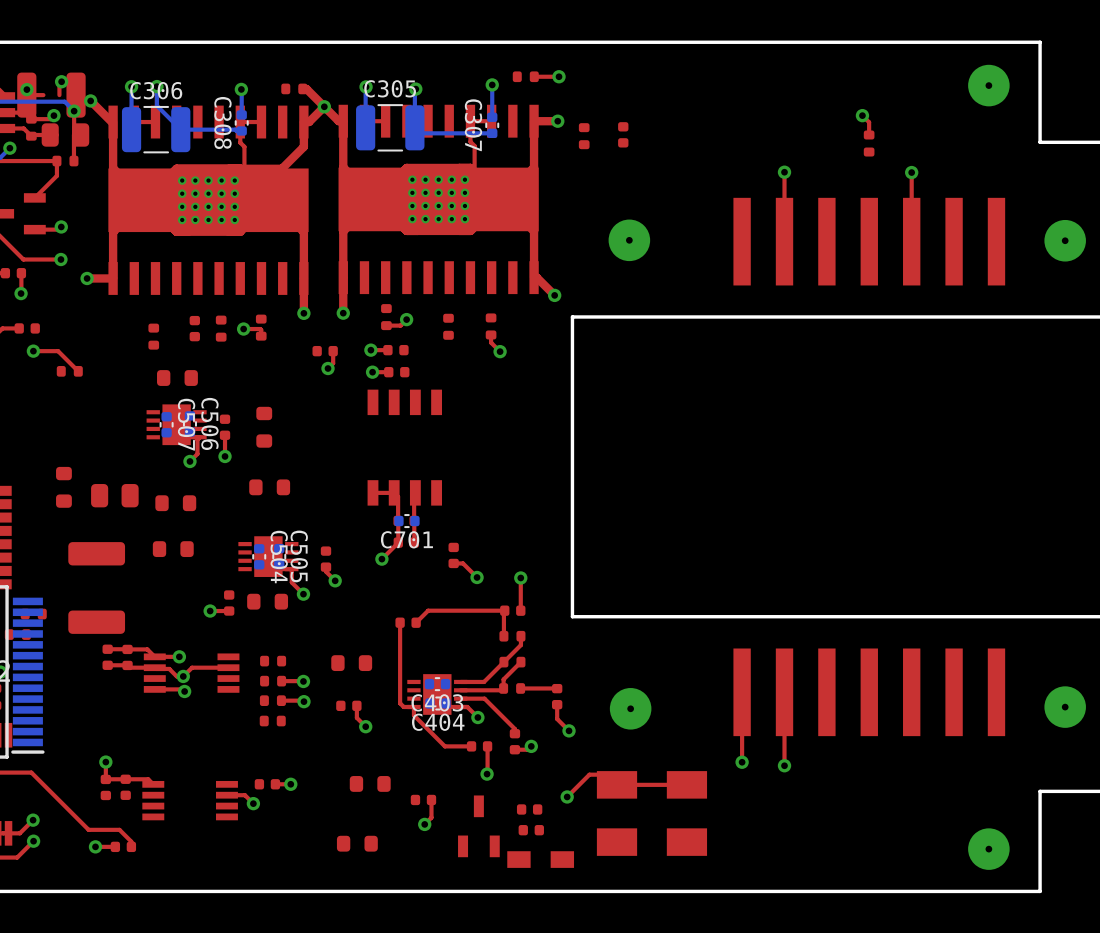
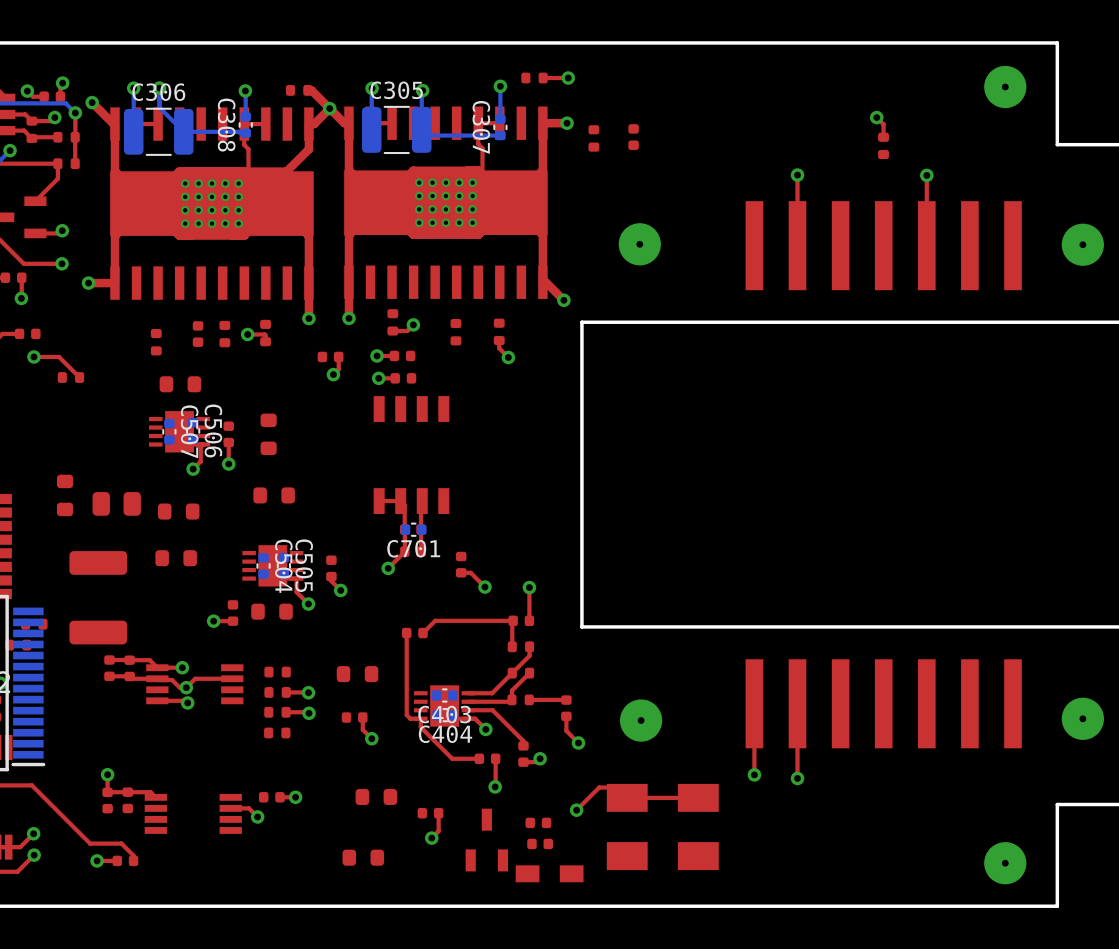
part footprint: [17, 72, 86, 118] -> [39, 91, 66, 102]
part footprint: [41, 123, 90, 147] -> [53, 131, 80, 143]

